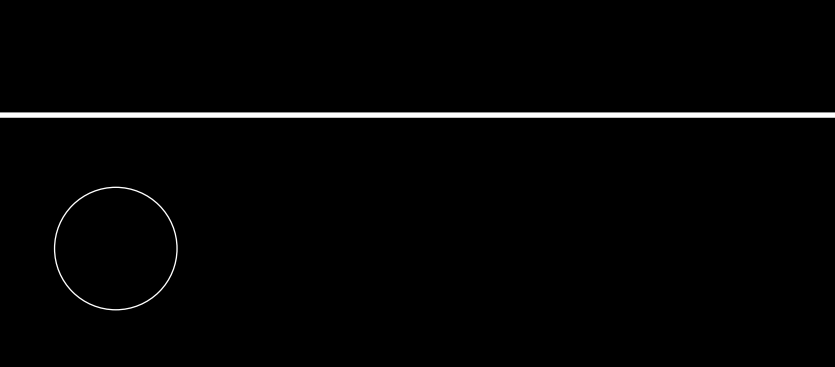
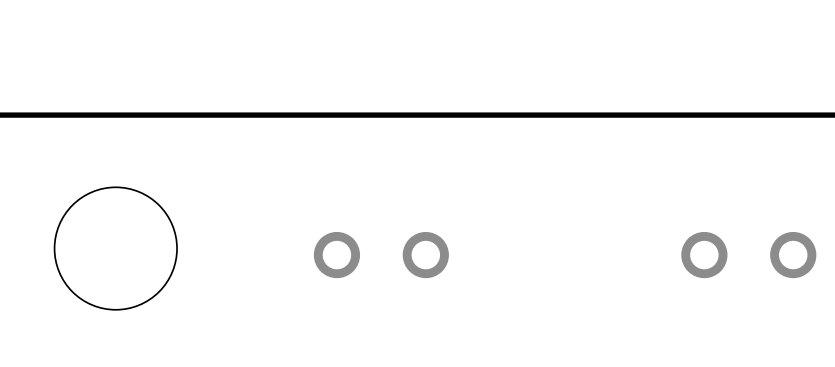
part: none -> (381, 255)
part: none -> (748, 255)

